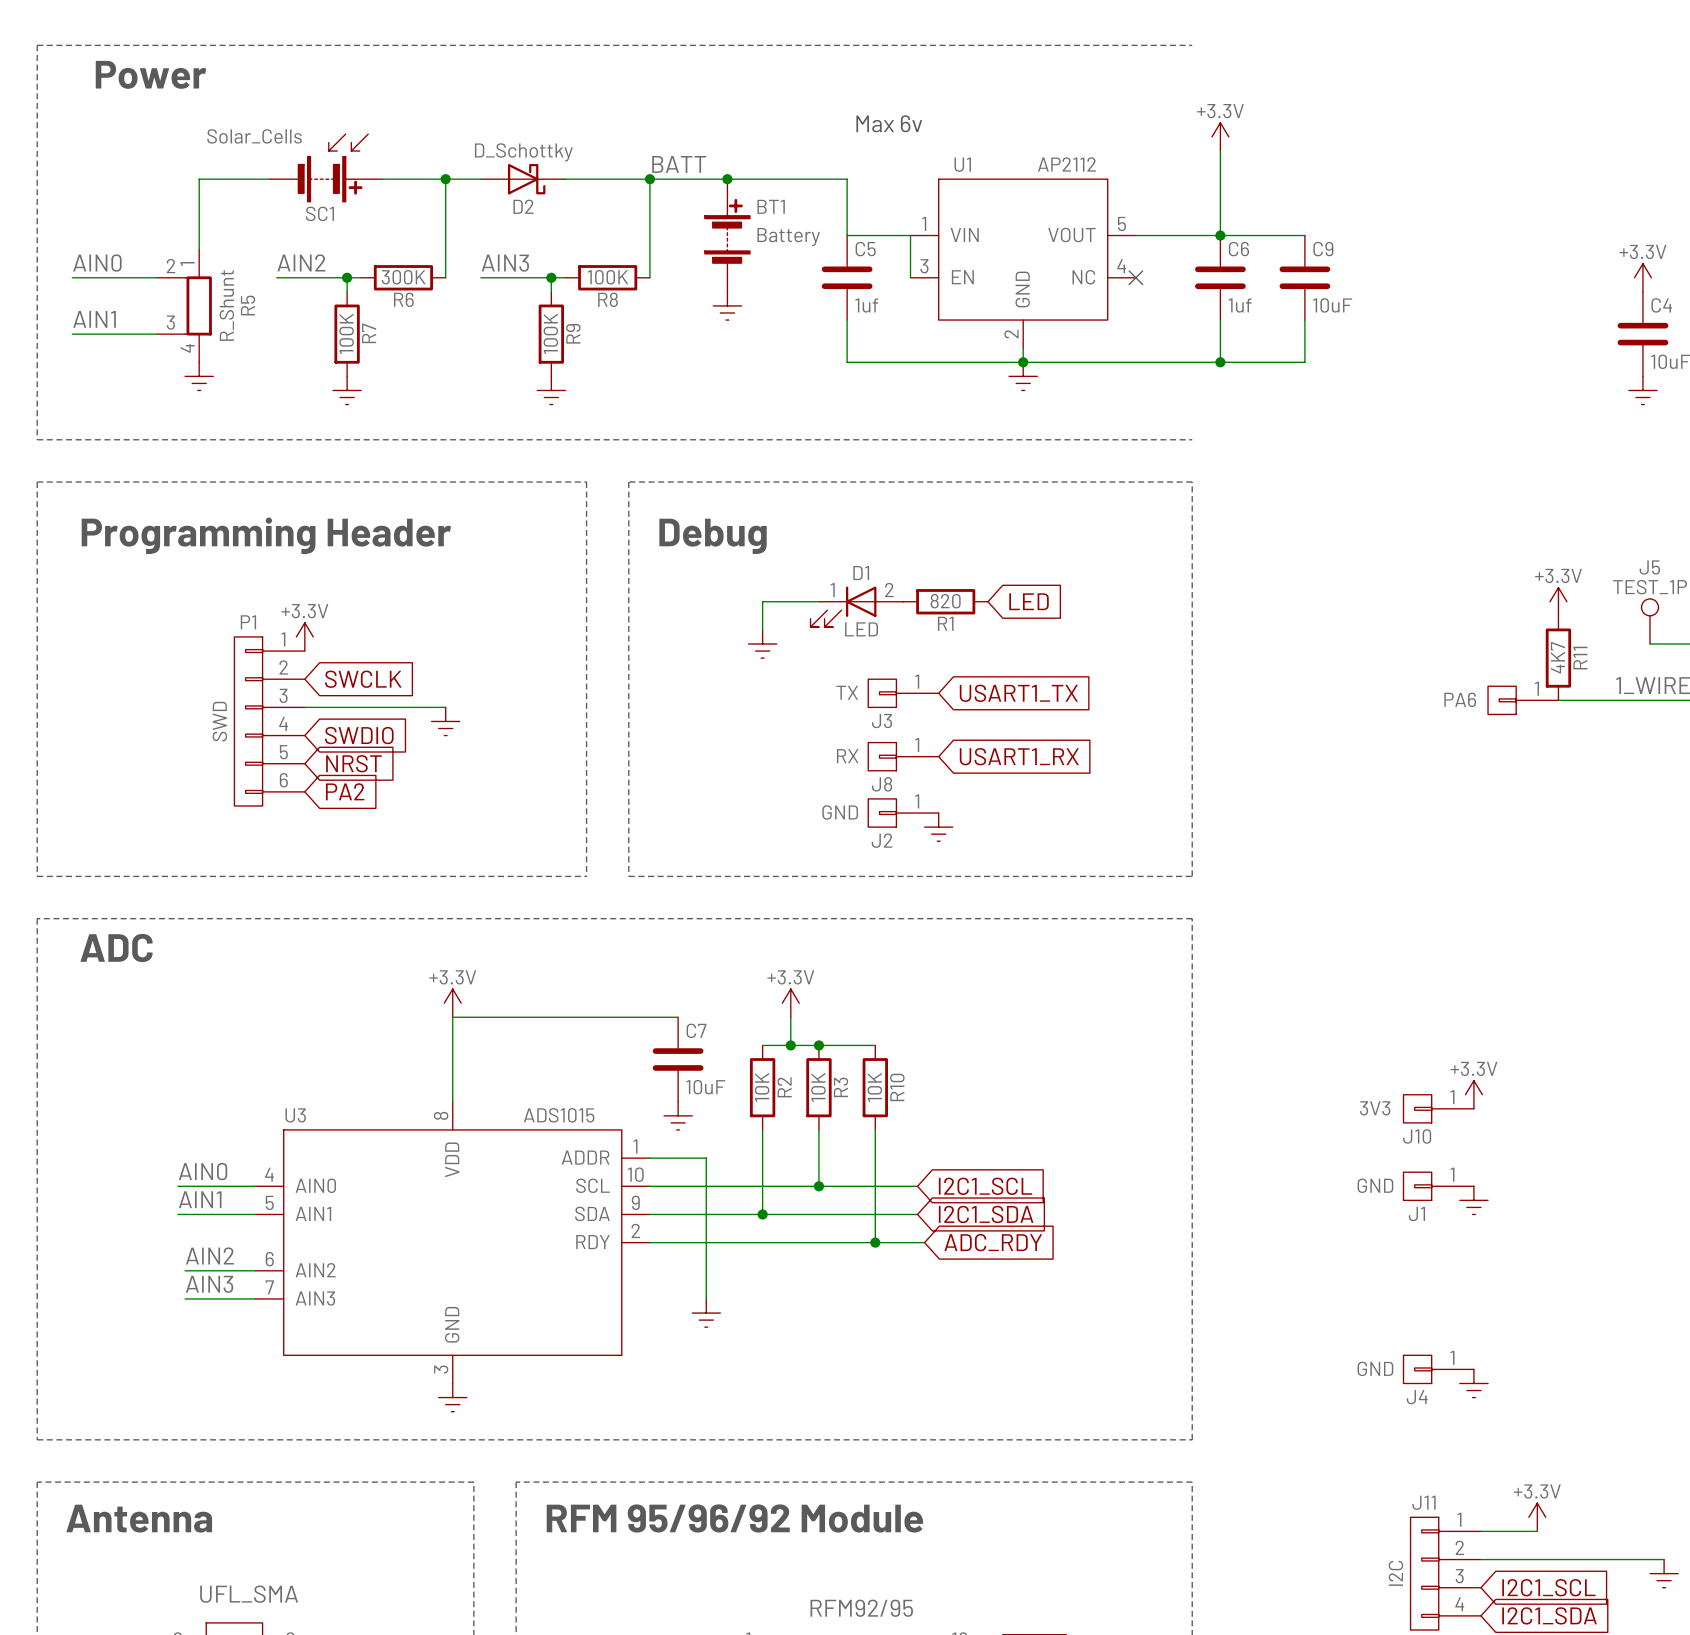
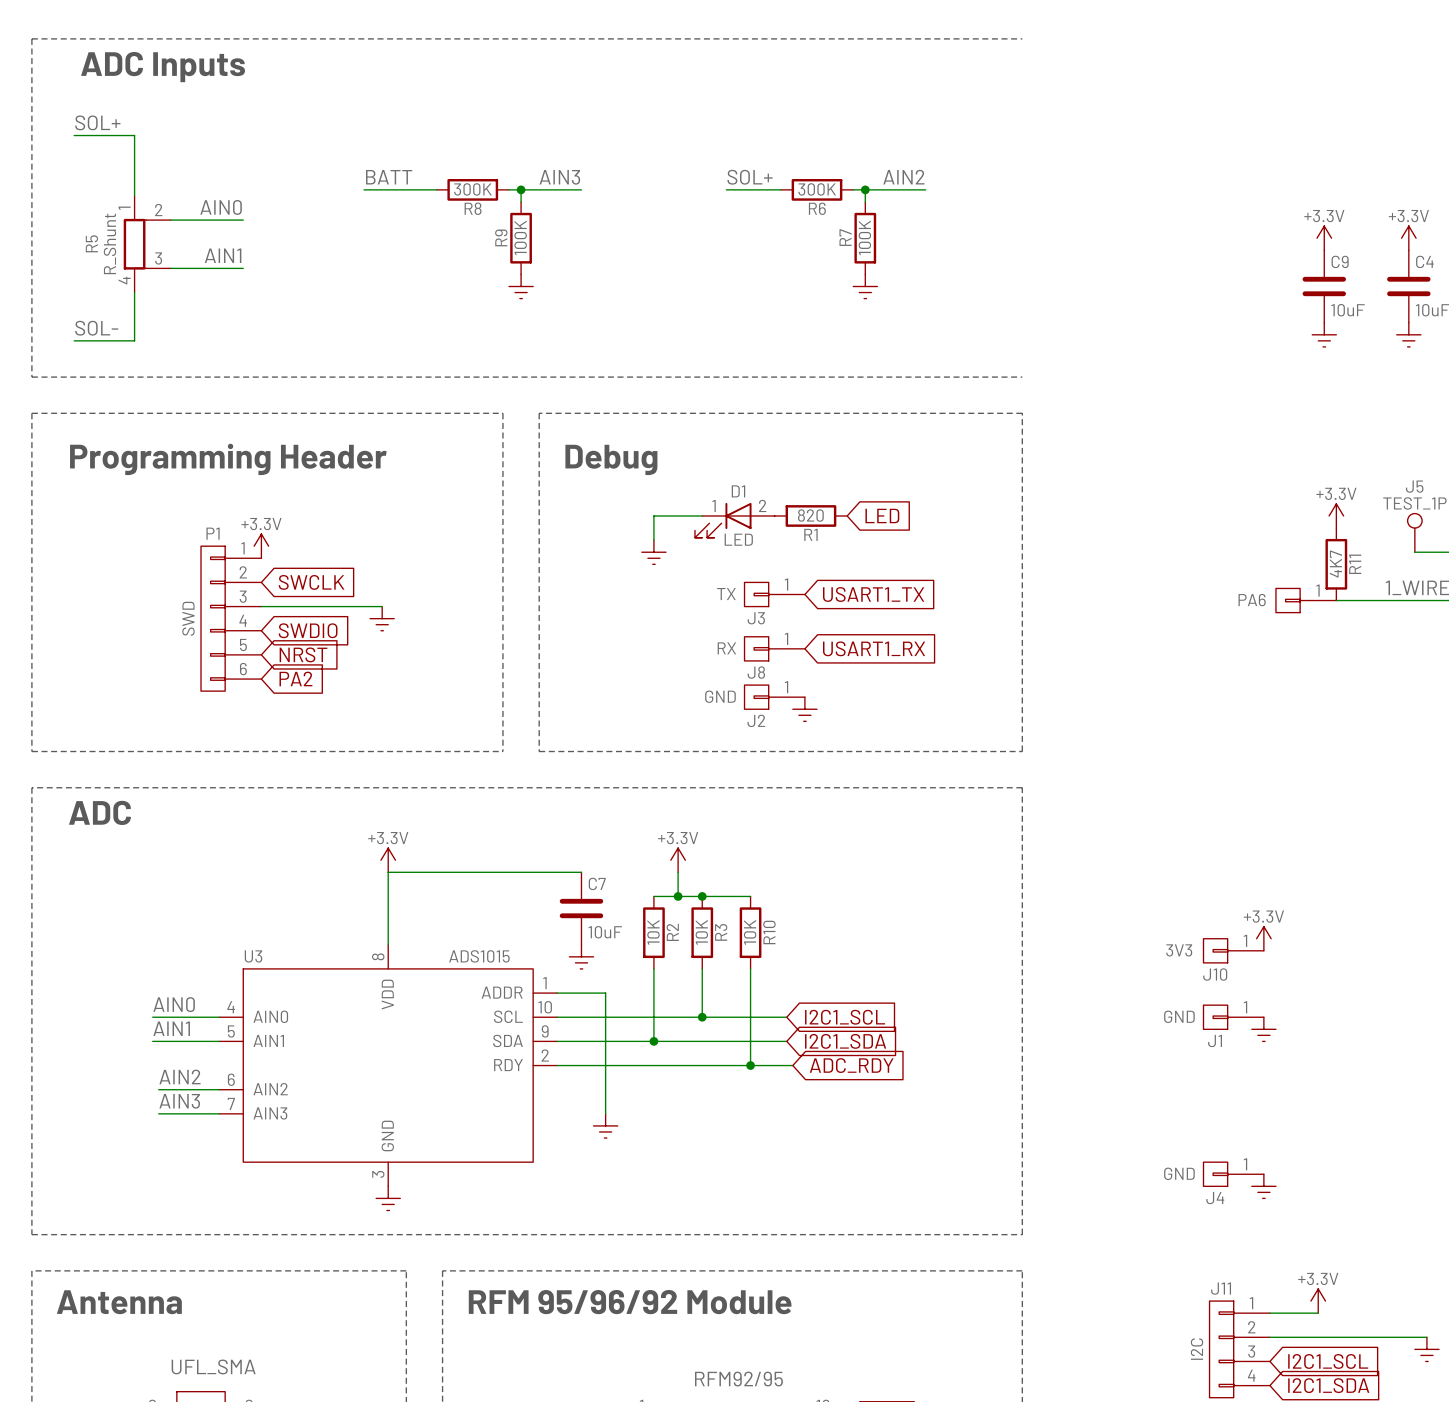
text: Power (150, 74) -> ADC Inputs (163, 67)
text: Max 6v (889, 123) -> none
power symbol: +3.3V (1220, 136) -> none
label: none -> SOL+ (97, 122)
wire: (1220, 151) (1220, 235) -> none
wire: none -> (74, 135) (134, 135) (134, 195)
label position: BATT (679, 164) -> BATT (389, 177)
SC1: Solar_Cells (325, 167) -> none
wire: (269, 179) (199, 179) (199, 249) -> none
wire: (382, 179) (480, 179) -> none
wire: (445, 179) (445, 277) -> none
junction: (445, 179) -> none
D2: D_Schottky (523, 179) -> none
wire: (565, 179) (847, 179) (847, 235) (910, 235) (910, 277) -> none
wire: (649, 179) (649, 277) -> none
junction: (649, 179) -> none
junction: (727, 179) -> none
label: none -> SOL+ (750, 177)
label: none -> AIN2 (903, 177)
wire: none -> (509, 189) (581, 189)
junction: none -> (521, 189)
wire: none -> (726, 189) (780, 189)
wire: none -> (853, 189) (925, 189)
junction: none -> (865, 189)
BT1: Battery (727, 235) -> none
wire: (1135, 235) (1304, 235) -> none
junction: (1220, 235) -> none
label: AIN2 (301, 262) -> none
label position: AIN0 (97, 263) -> AIN0 (221, 207)
label position: AIN3 (505, 263) -> AIN3 (559, 177)
U1: AP2112 (1023, 263) -> none
wire: (72, 277) (156, 277) -> (170, 220) (243, 220)
wire: (276, 277) (361, 277) -> none
wire: (347, 277) (347, 291) -> none
junction: (347, 277) -> none
R6 position: (403, 277) -> (816, 189)
wire: (480, 277) (565, 277) -> (364, 189) (436, 189)
wire: (551, 277) (551, 291) -> (521, 189) (521, 201)
junction: (551, 277) -> none
R8 position: (607, 277) -> (472, 189)
R8 value: 100K (607, 277) -> 300K (472, 189)
C5: 1uf (847, 277) -> none
no-connect mark: (1135, 277) -> none
C6: 1uf (1220, 277) -> none
C9 position: (1304, 277) -> (1324, 286)
power symbol: none -> +3.3V (1324, 238)
R5 flip: as is (198, 305) -> left-right (135, 244)
power symbol: (727, 305) -> none
label position: AIN1 (94, 319) -> AIN1 (223, 255)
wire: (847, 320) (847, 362) (1304, 362) (1304, 320) -> none
wire: (1220, 320) (1220, 362) -> none
R7 name position: R7 (369, 333) -> R7 (845, 237)
R9 name position: R9 (573, 333) -> R9 (501, 237)
wire: (72, 334) (156, 334) -> (170, 268) (243, 268)
R7 position: (347, 334) -> (865, 238)
R9 position: (551, 334) -> (521, 238)
power symbol: none -> (521, 286)
wire: none -> (134, 292) (134, 340) (74, 340)
wire: (1023, 348) (1023, 362) -> (865, 189) (865, 201)
junction: (1023, 362) -> none
junction: (1220, 362) -> none
power symbol: (199, 376) -> none
power symbol position: (1023, 376) -> (865, 286)
label: none -> SOL- (96, 328)
power symbol: (347, 390) -> none
power symbol: (551, 390) -> none
power symbol: none -> (1324, 334)

